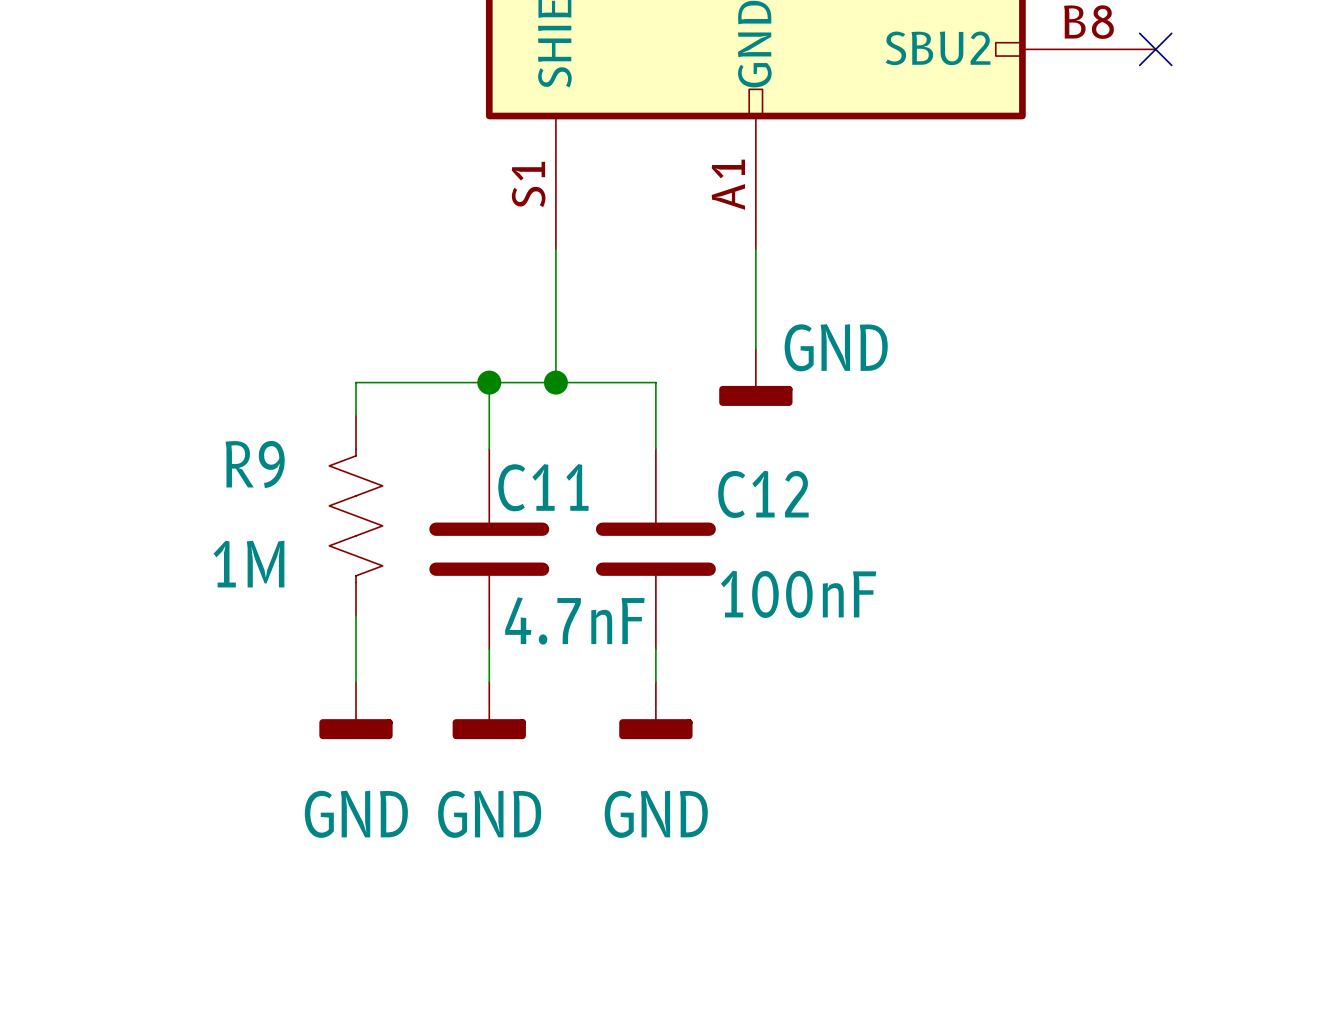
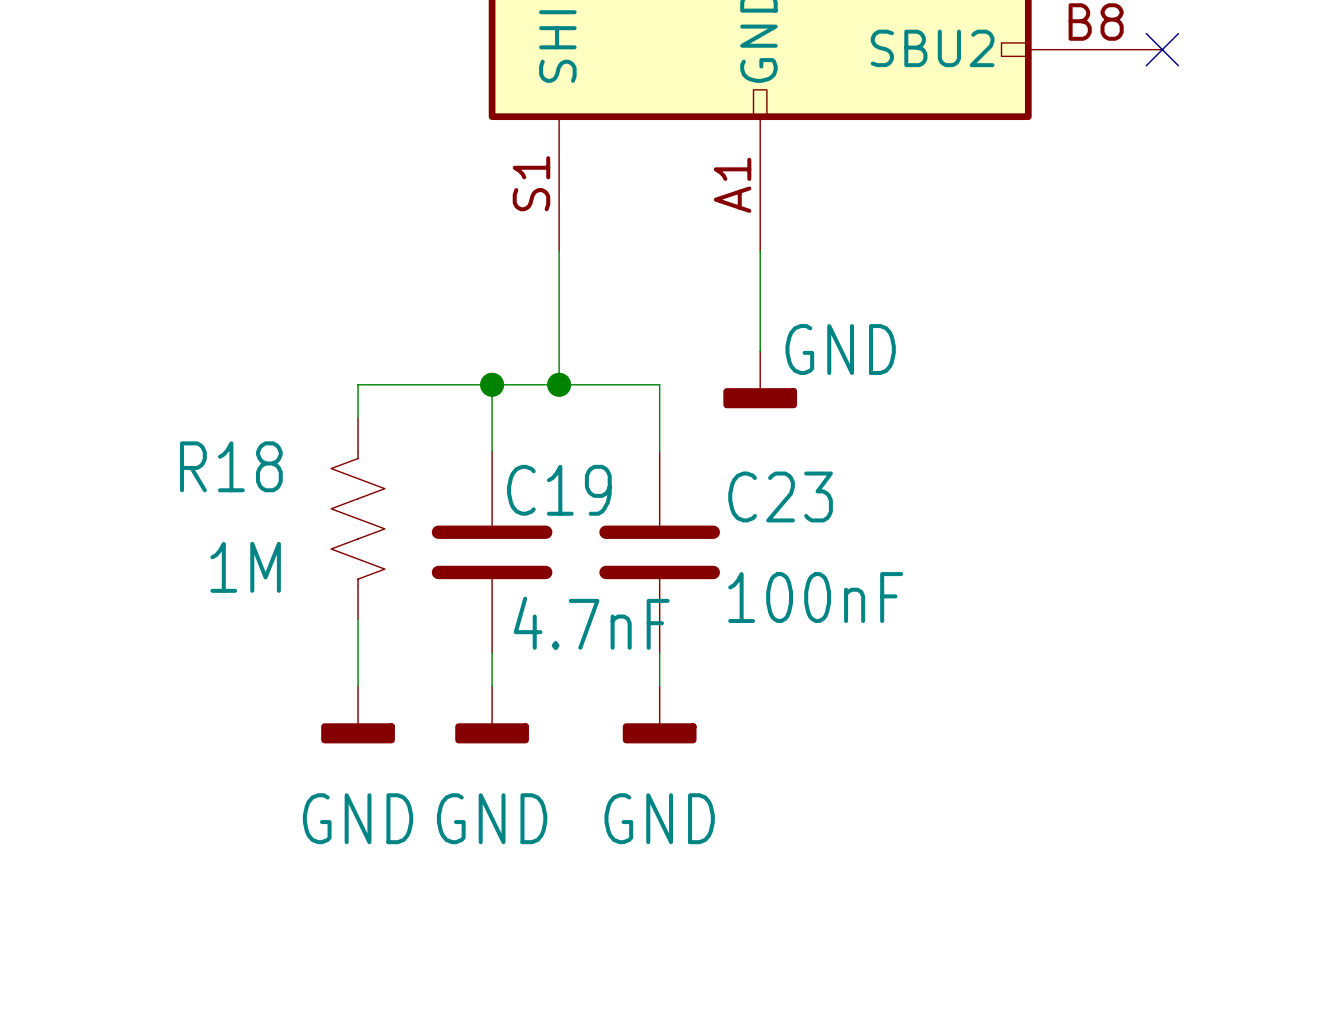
R9 name: R9 (255, 464) -> R18 (231, 466)
C11 name: C11 (543, 487) -> C19 (559, 490)
C12 name: C12 (763, 494) -> C23 (780, 496)

